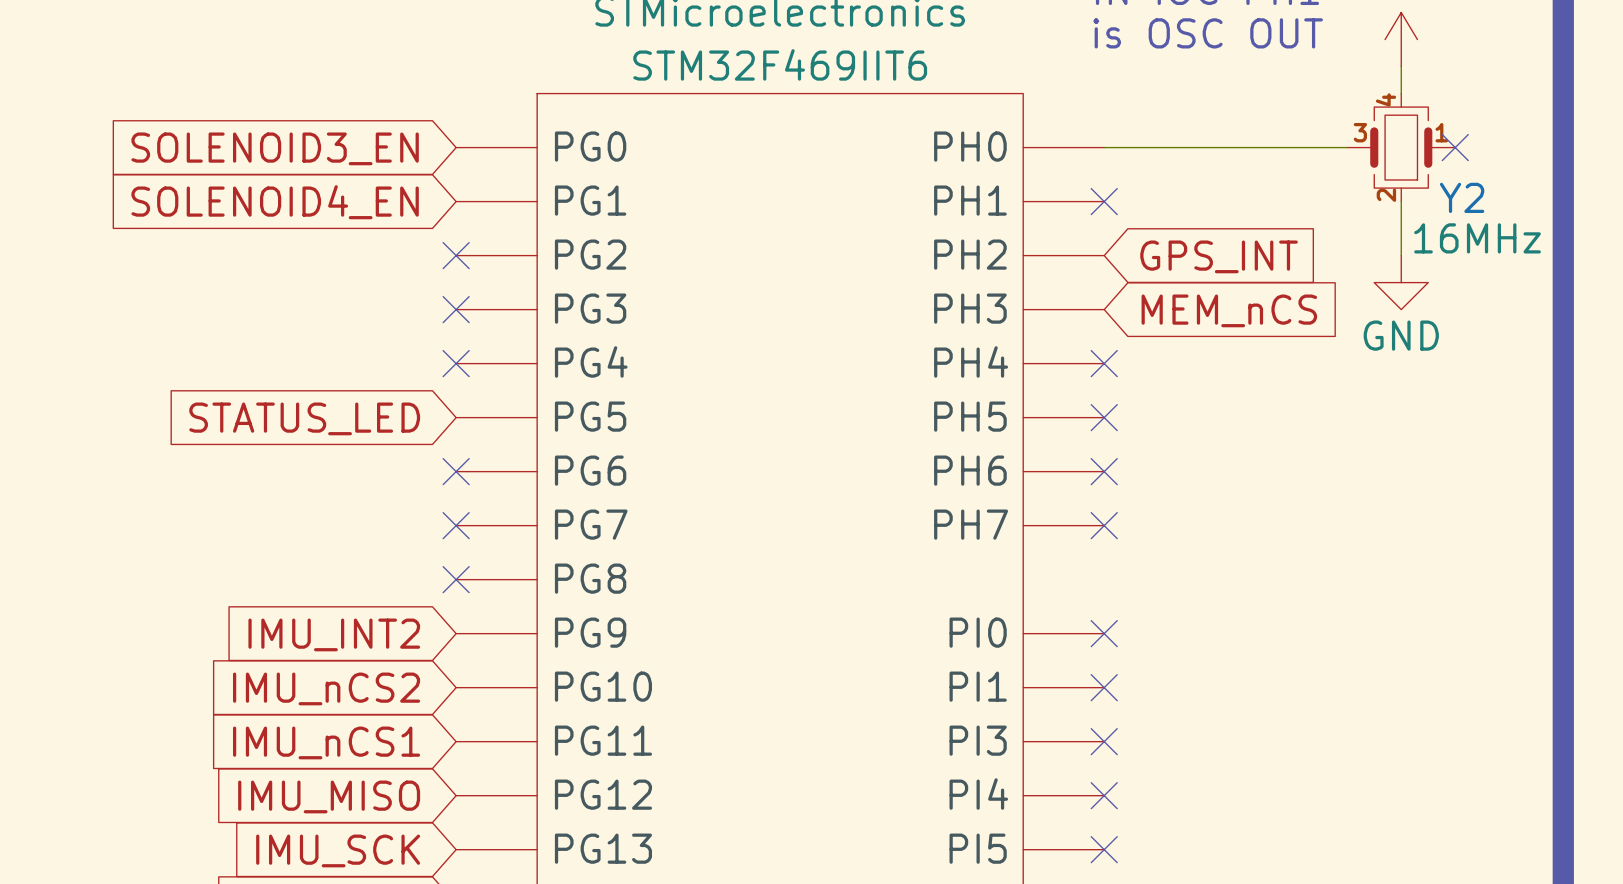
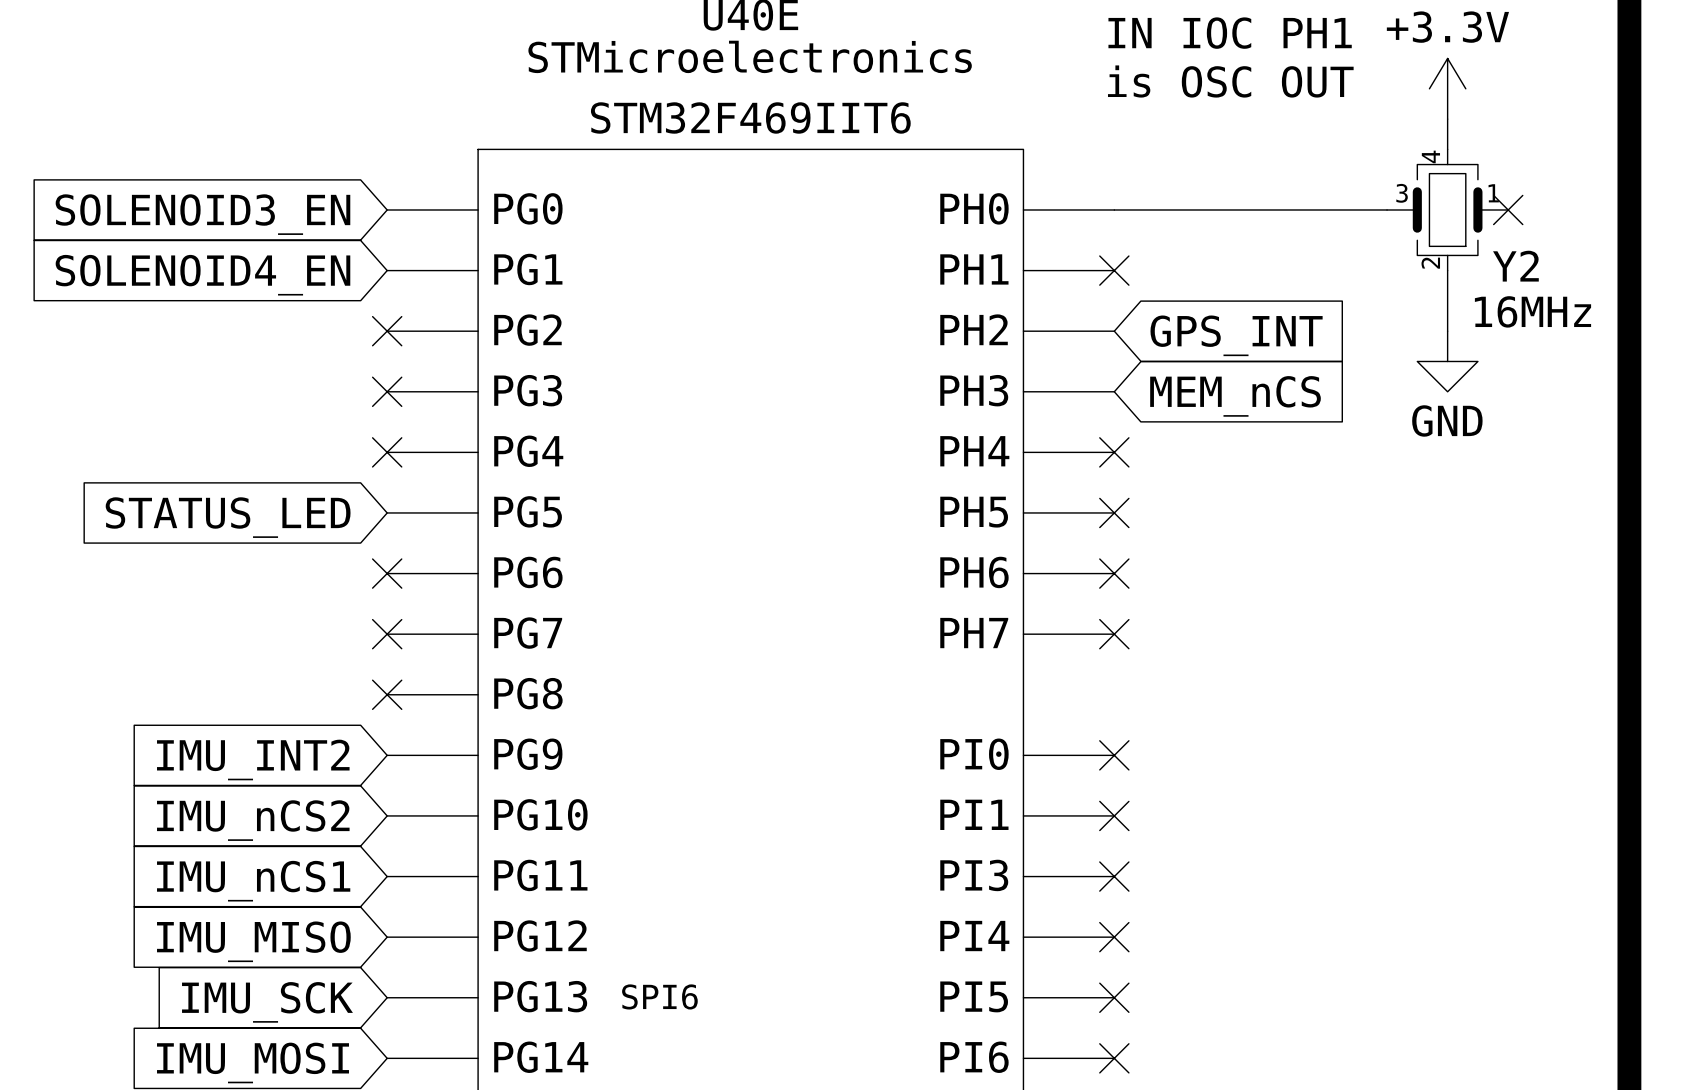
text: none -> SPI6 (659, 996)

